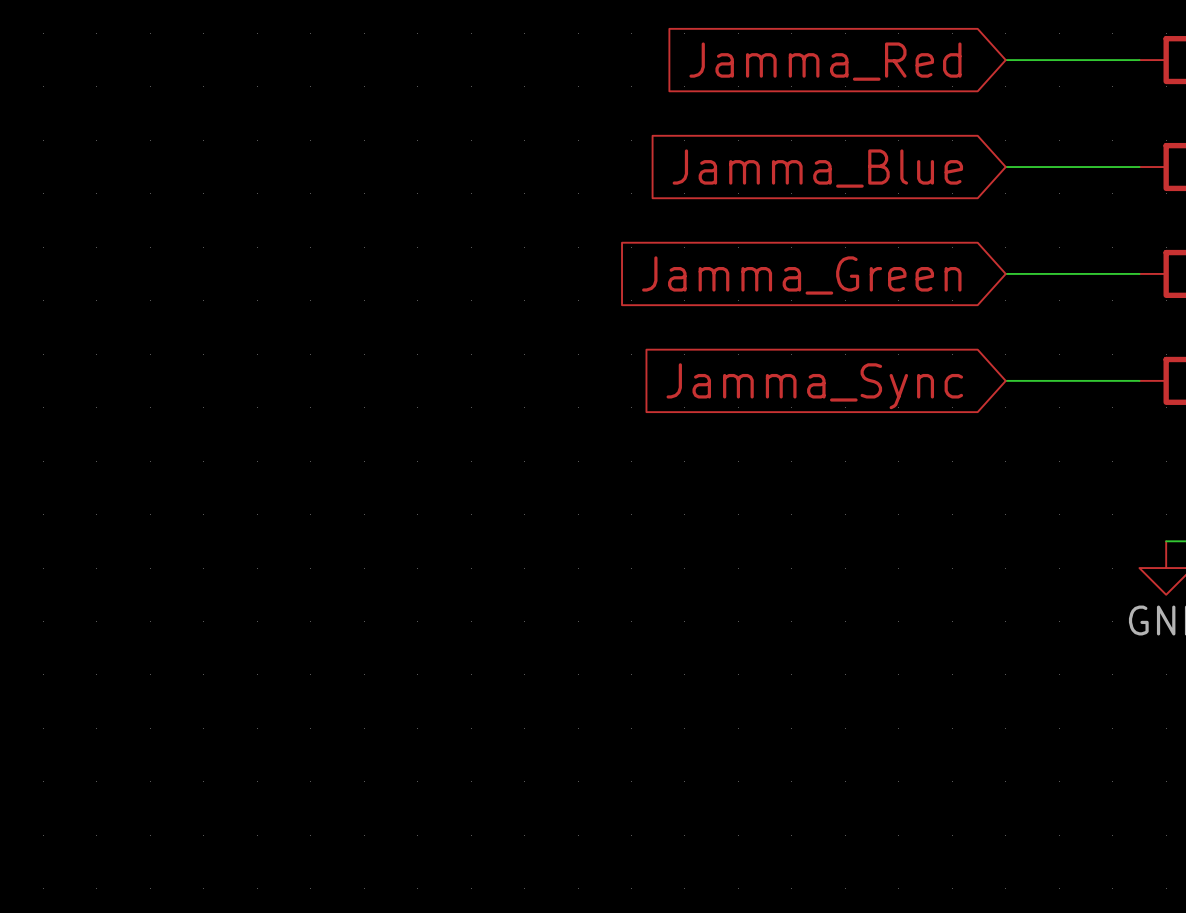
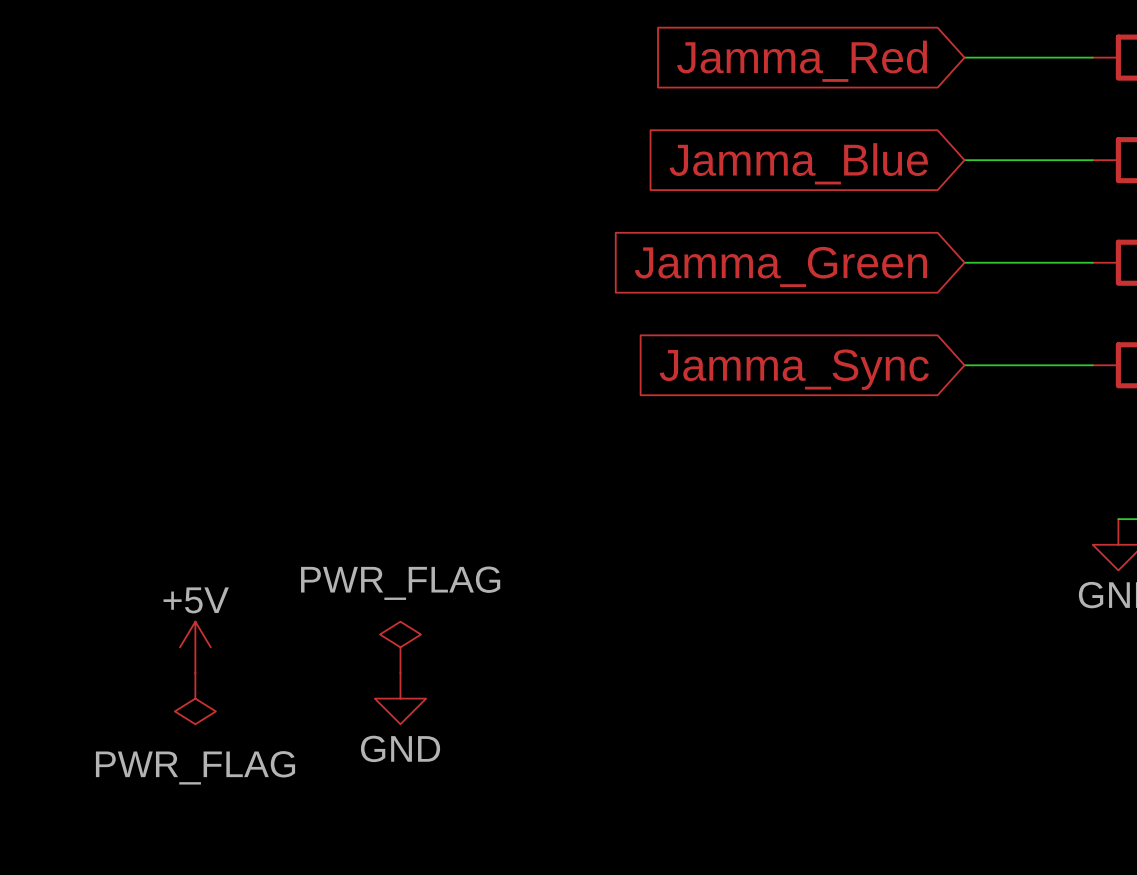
power symbol: none -> +5V (195, 647)
power symbol: none -> PWR_FLAG (400, 647)
power symbol: none -> PWR_FLAG (195, 698)
power symbol: none -> GND (400, 698)

